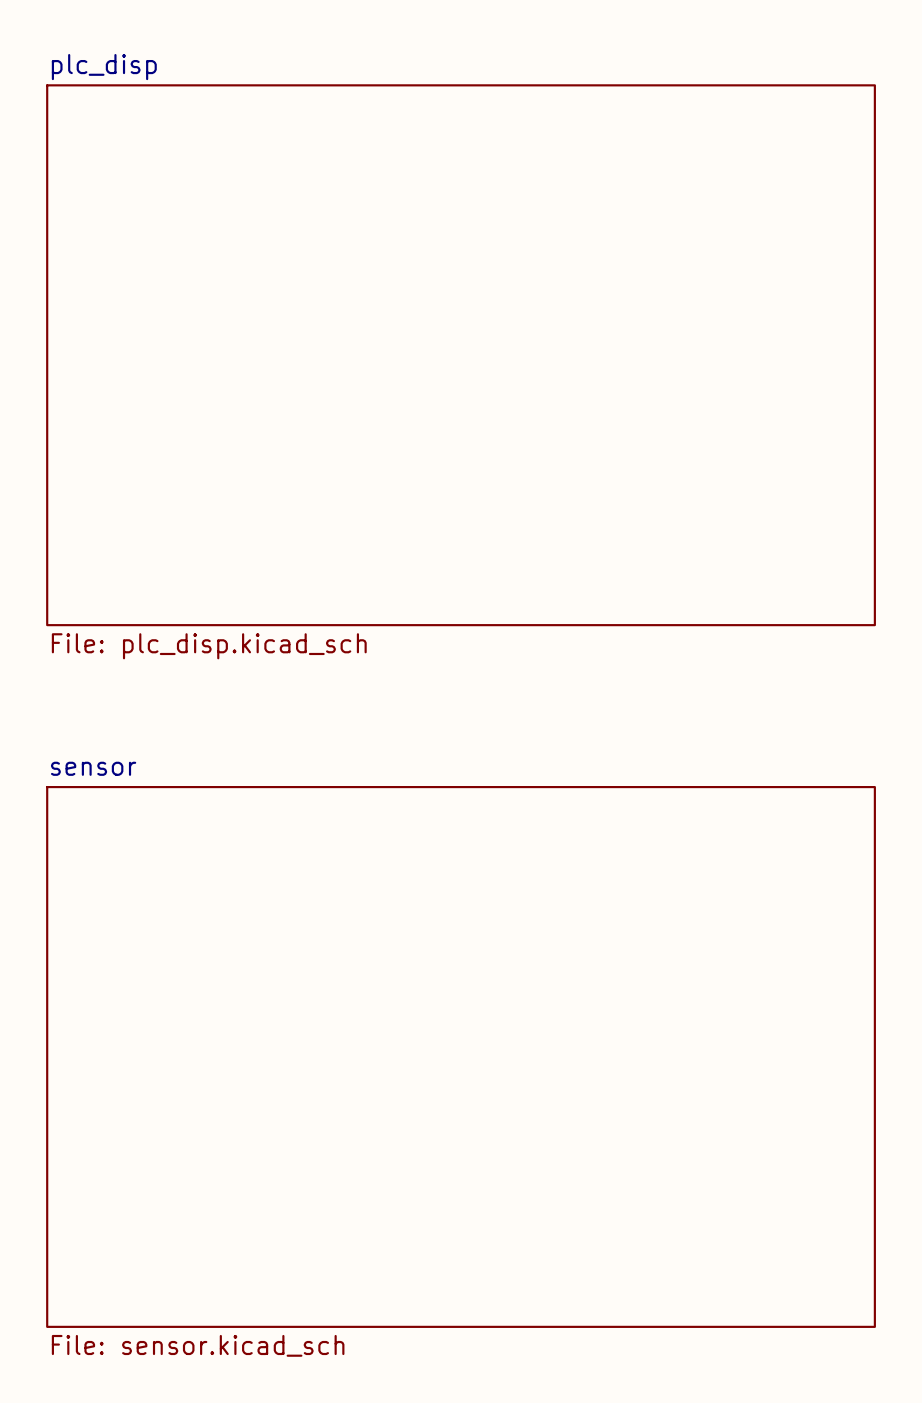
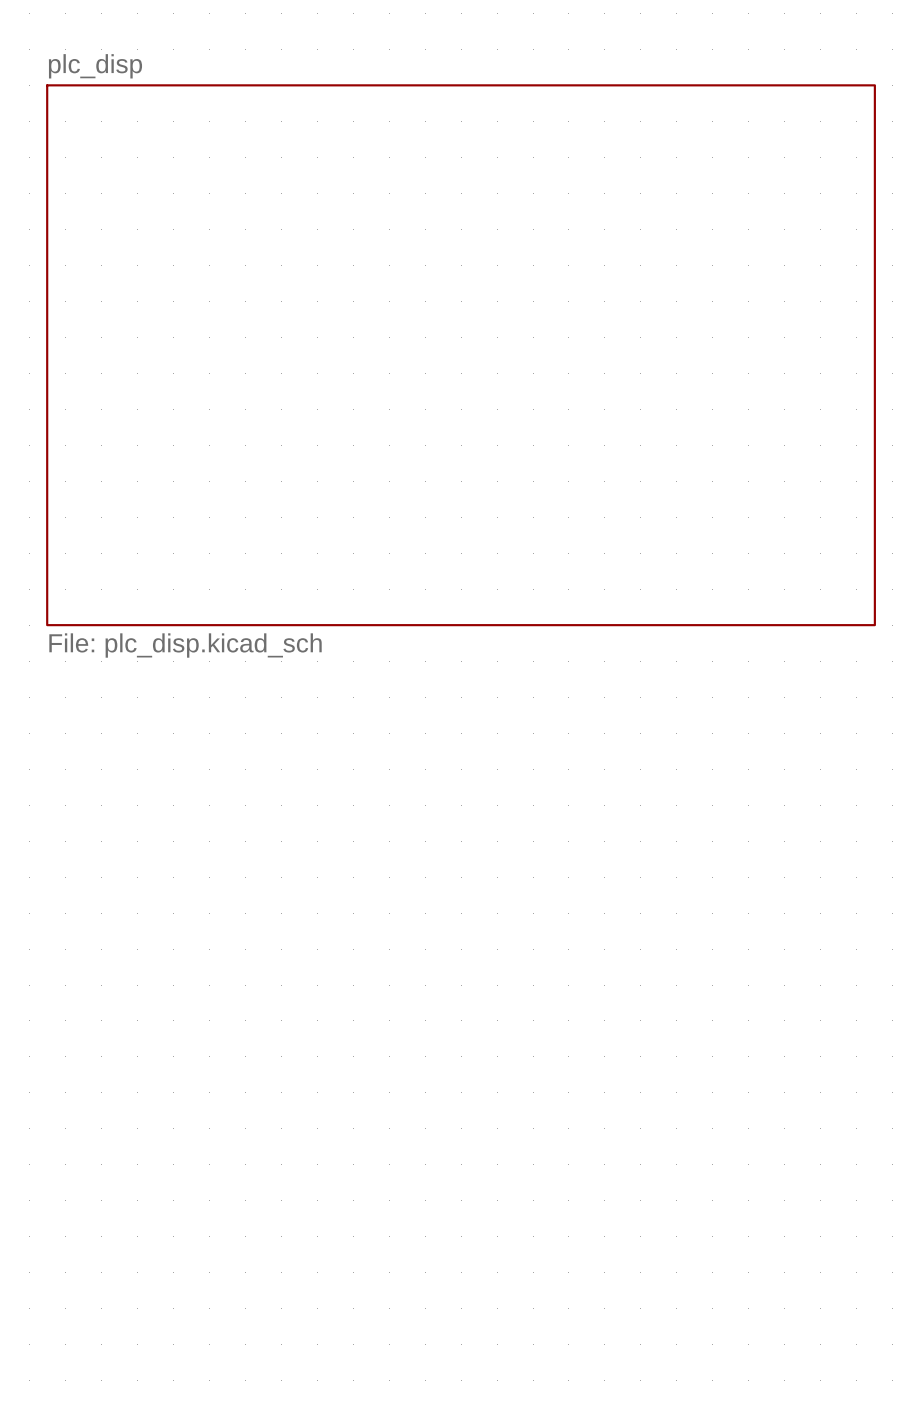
sheet sensor: File: sensor.kicad_sch (461, 1056) -> none

